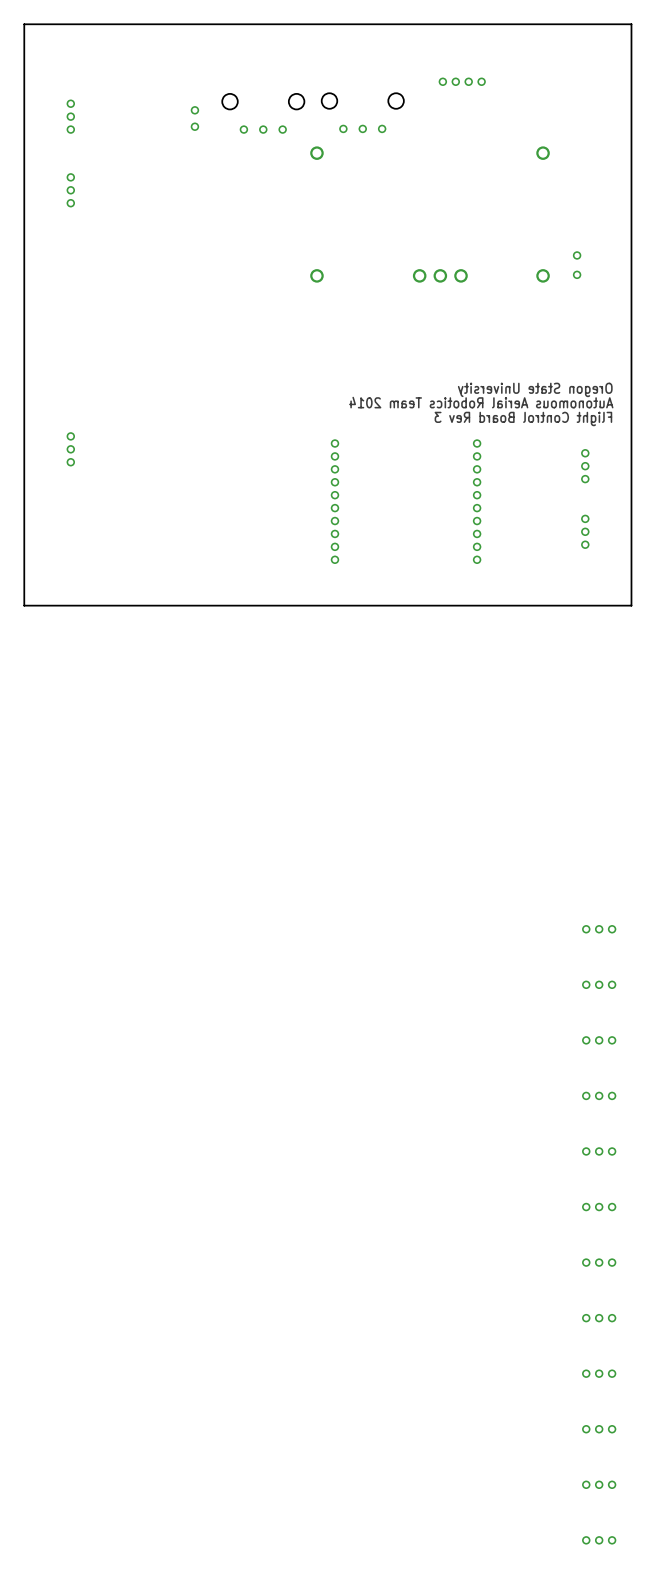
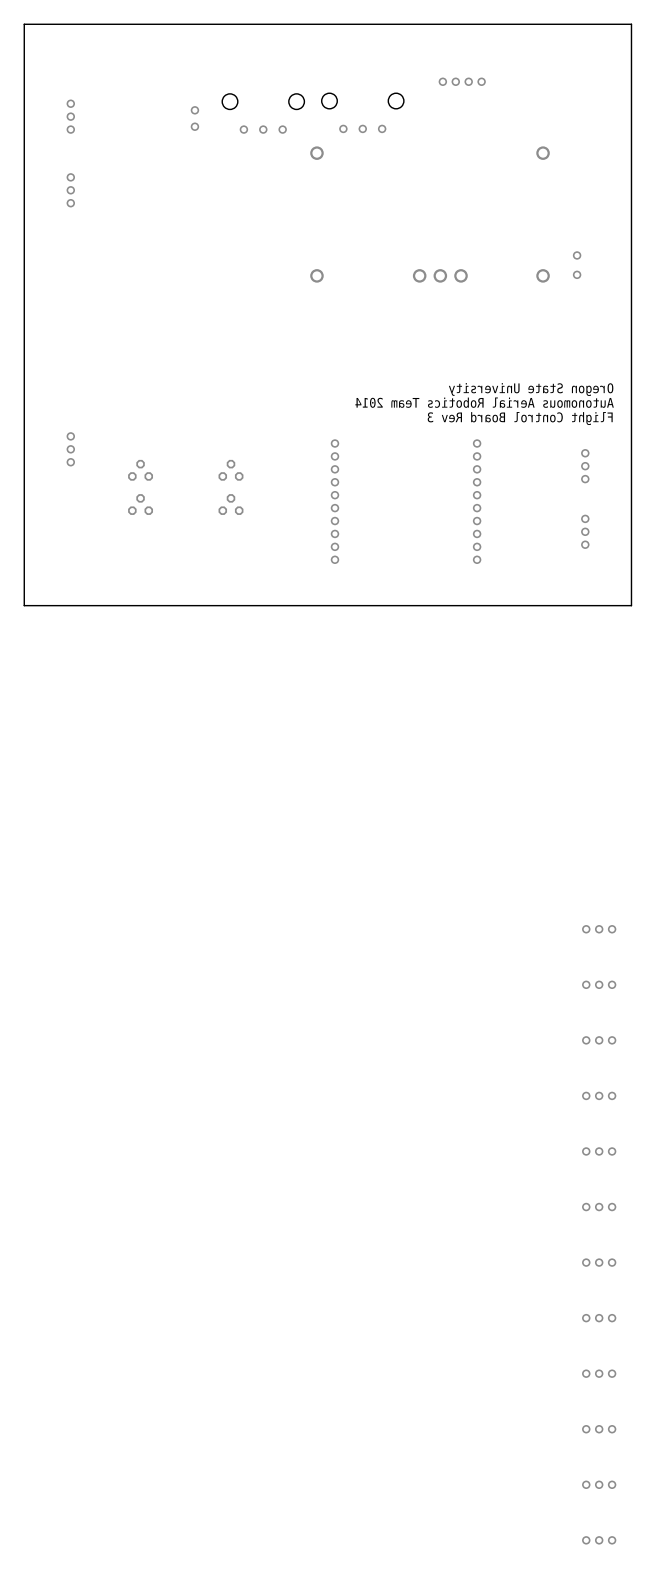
part: none -> (140, 470)
part: none -> (230, 470)
part: none -> (140, 504)
part: none -> (230, 504)

